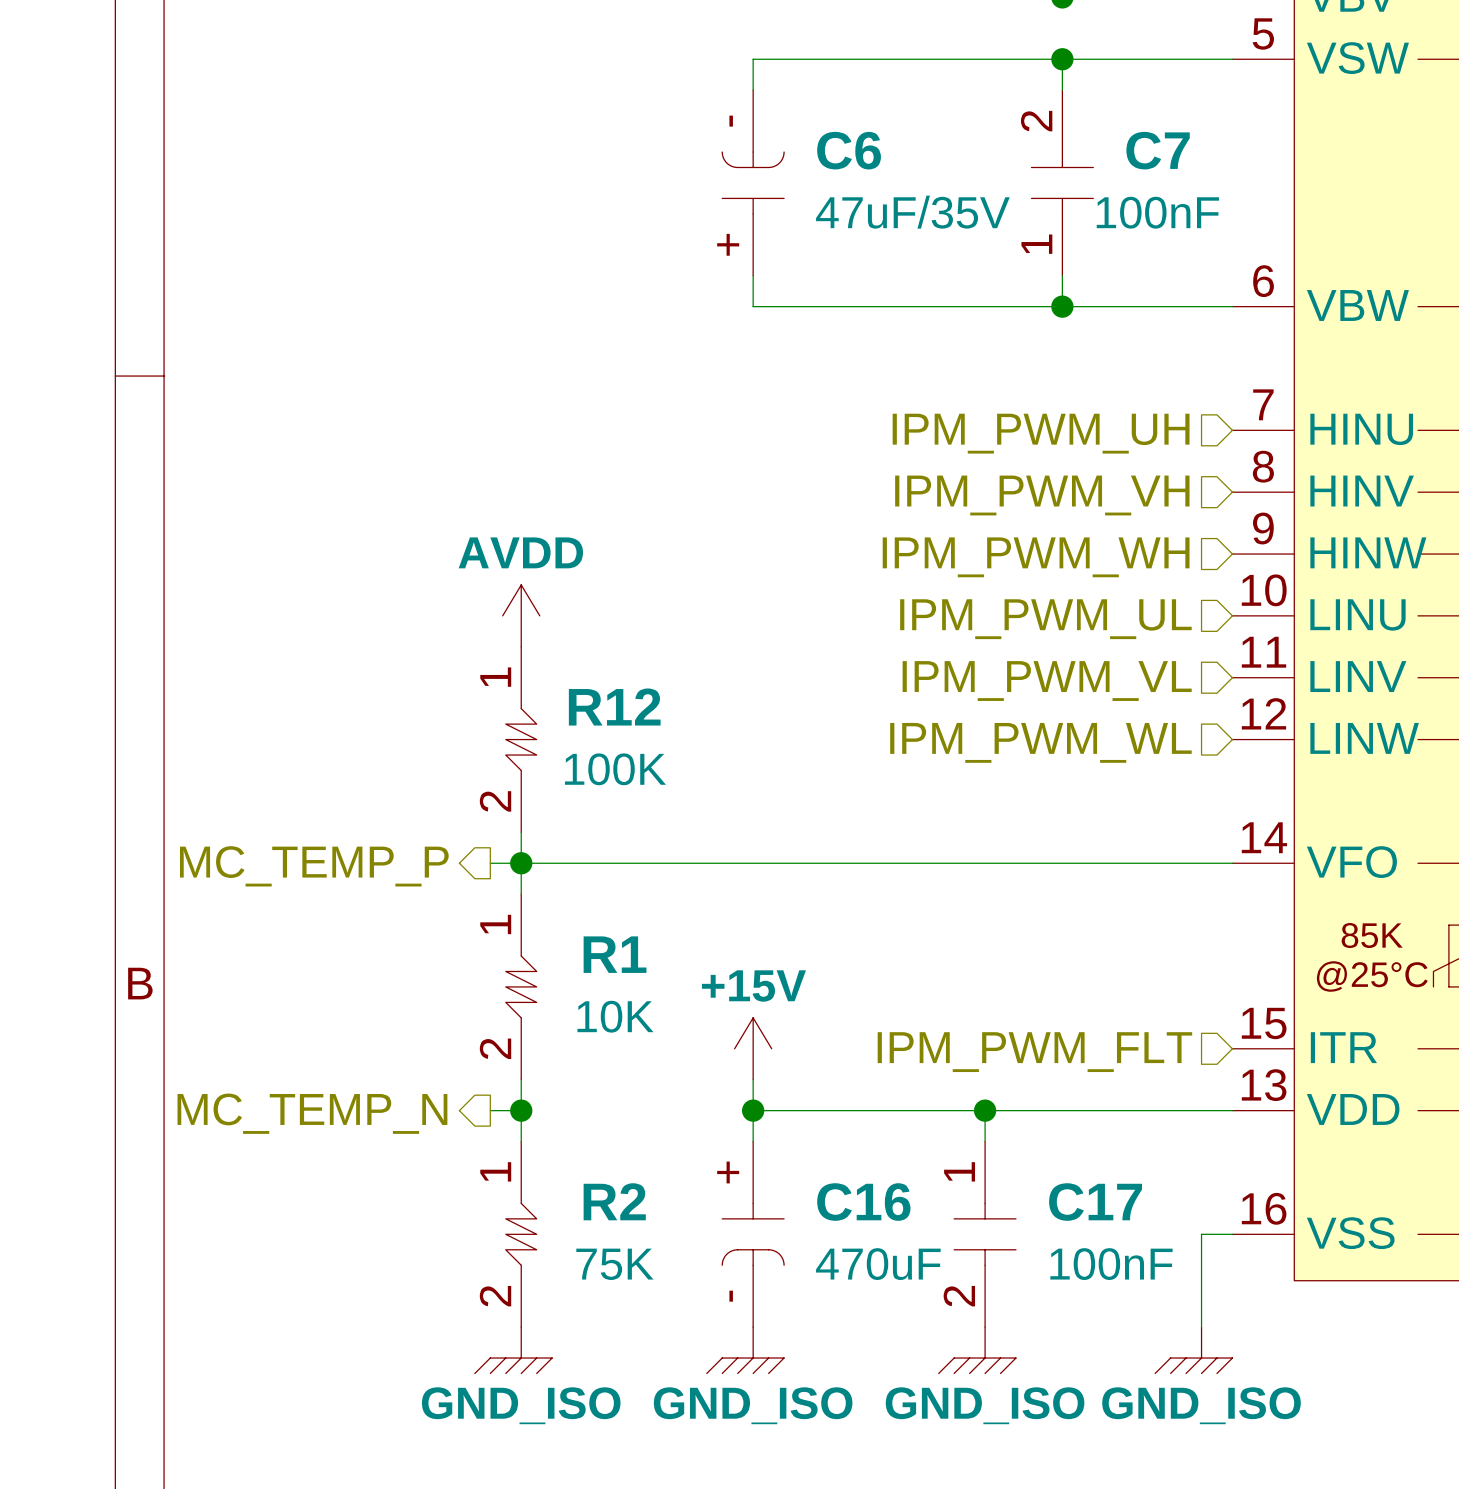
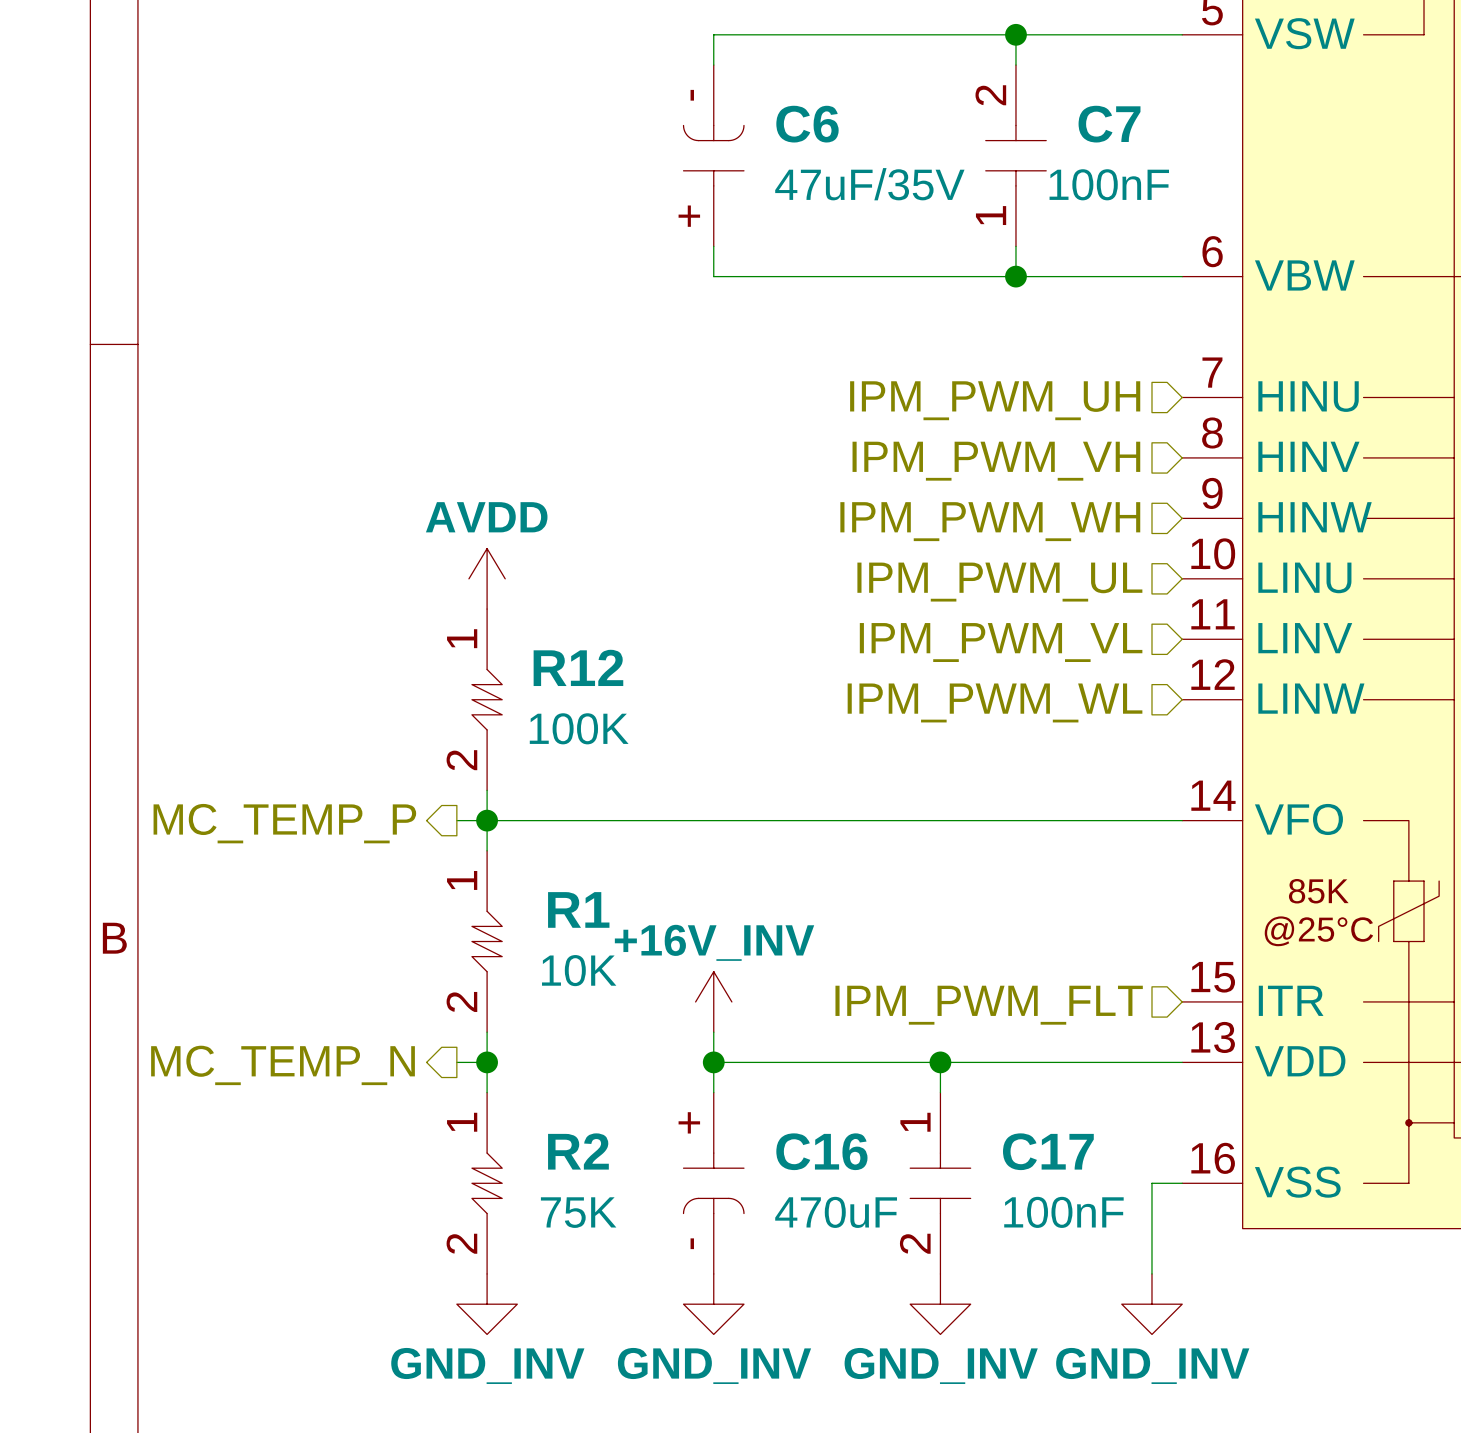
power symbol: +15V (753, 1048) -> +16V_INV (713, 1001)
power symbol: GND_ISO (513, 1350) -> GND_INV (487, 1304)
power symbol: GND_ISO (745, 1350) -> GND_INV (713, 1304)
power symbol: GND_ISO (977, 1350) -> GND_INV (940, 1304)
power symbol: GND_ISO (1193, 1350) -> GND_INV (1151, 1304)

